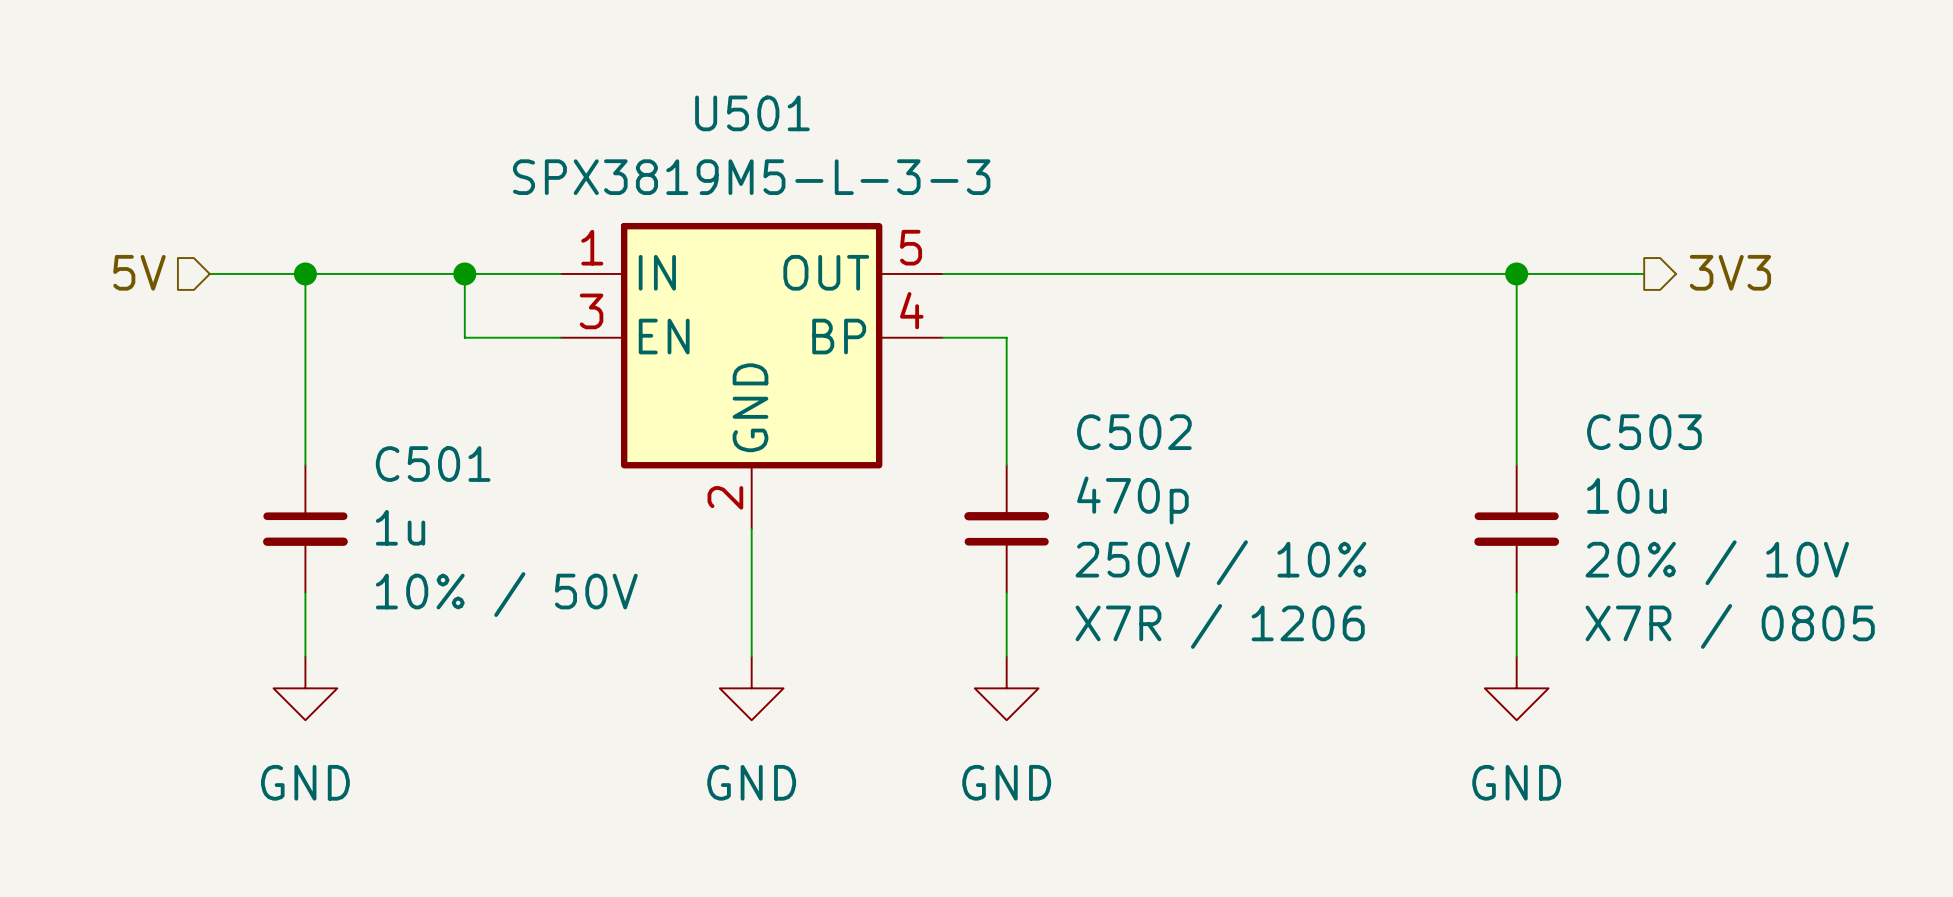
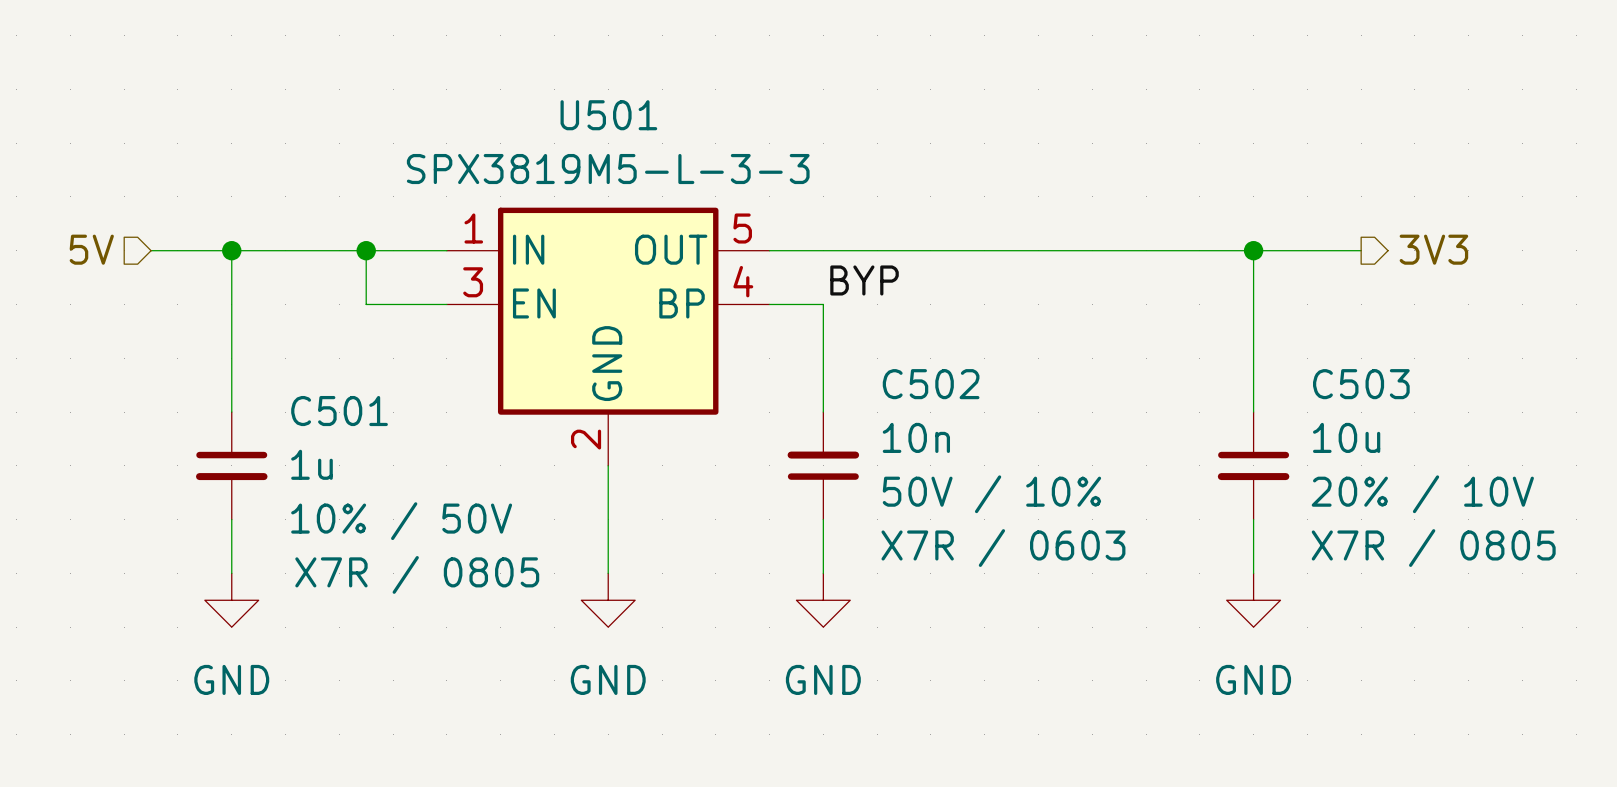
label: none -> BYP (864, 280)
C502 value: 470p (1132, 500) -> 10n (916, 437)
C502 text: 250V / 10% (1220, 562) -> 50V / 10% (991, 494)
C502 text: X7R / 1206 (1220, 626) -> X7R / 0603 (1003, 548)
C501 text: none -> X7R / 0805 (417, 574)

